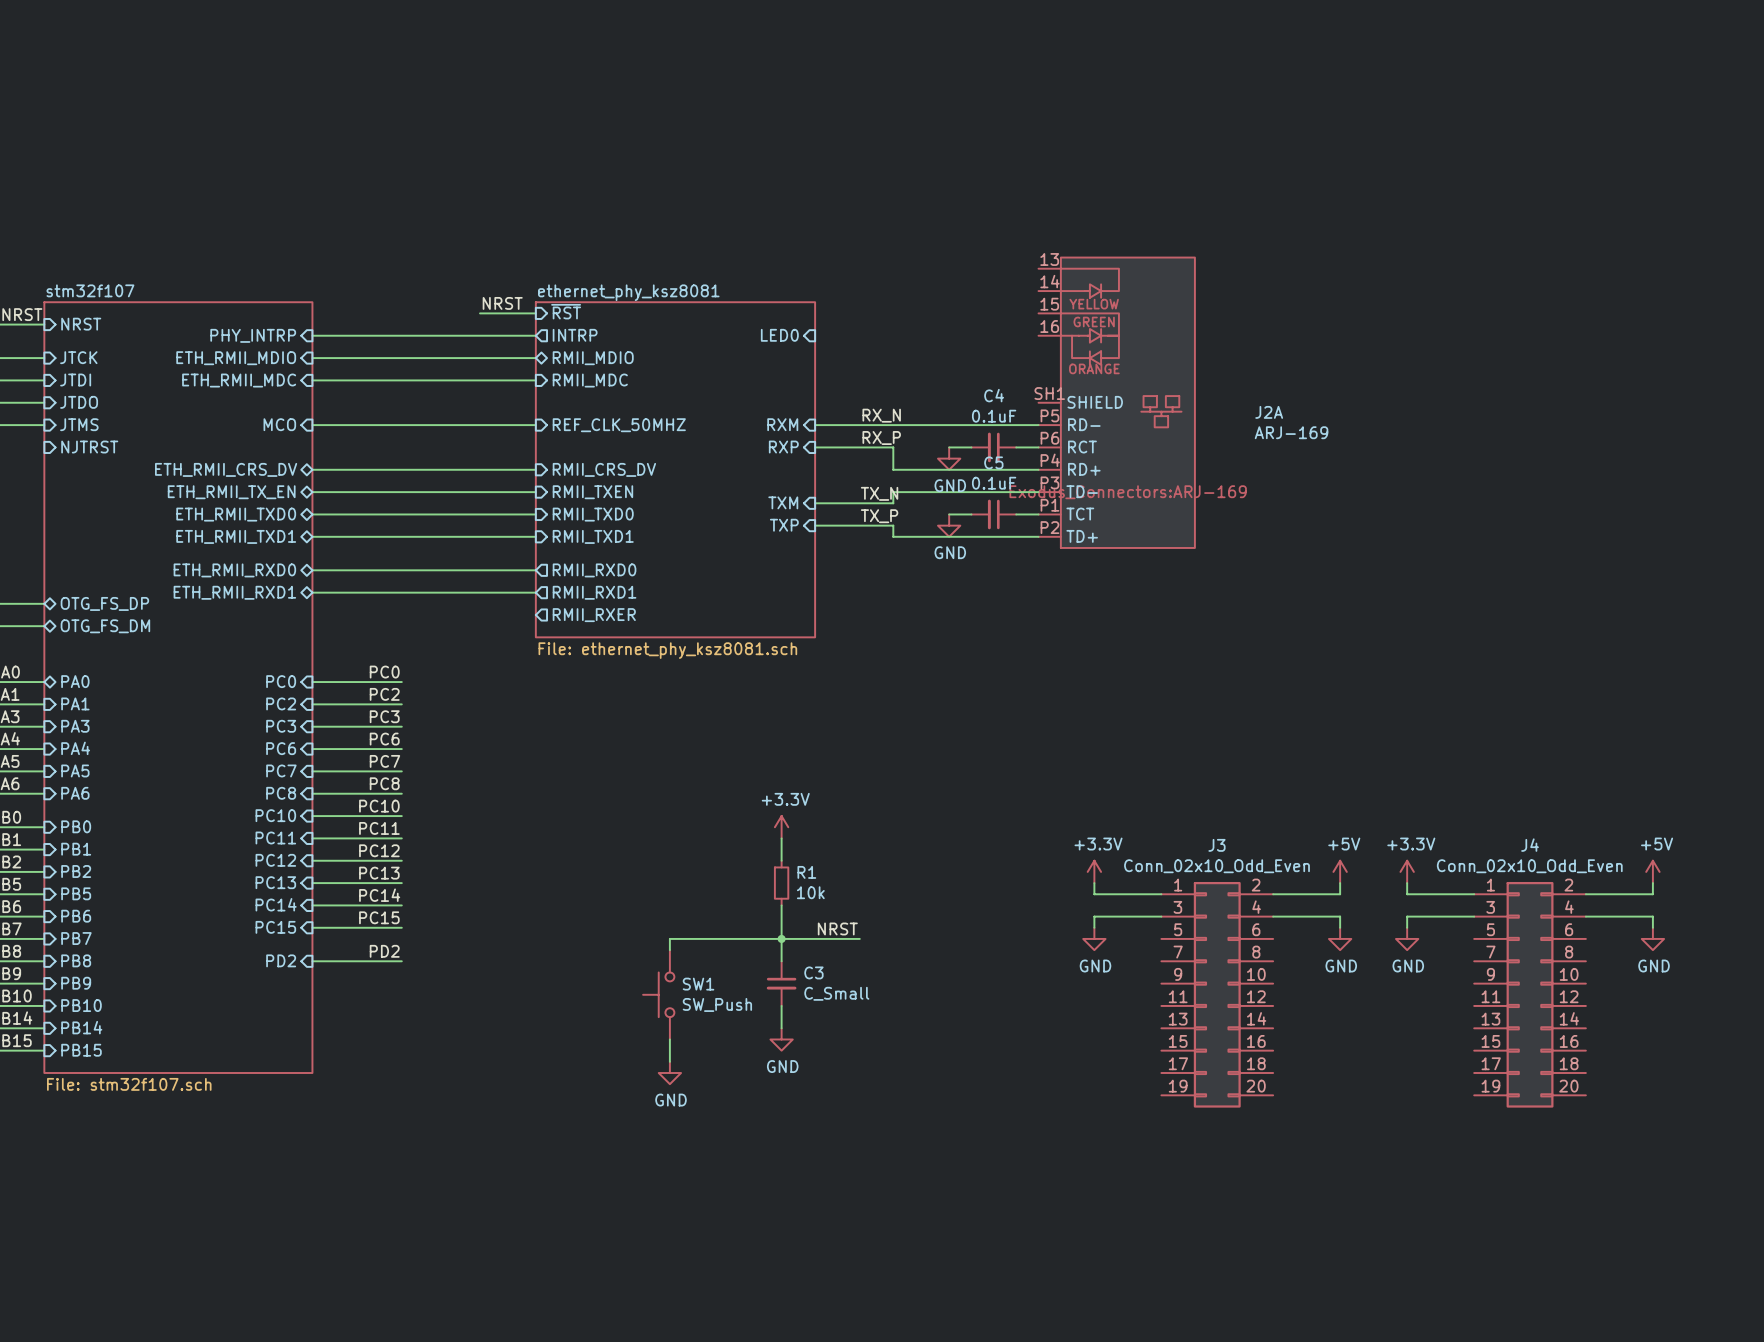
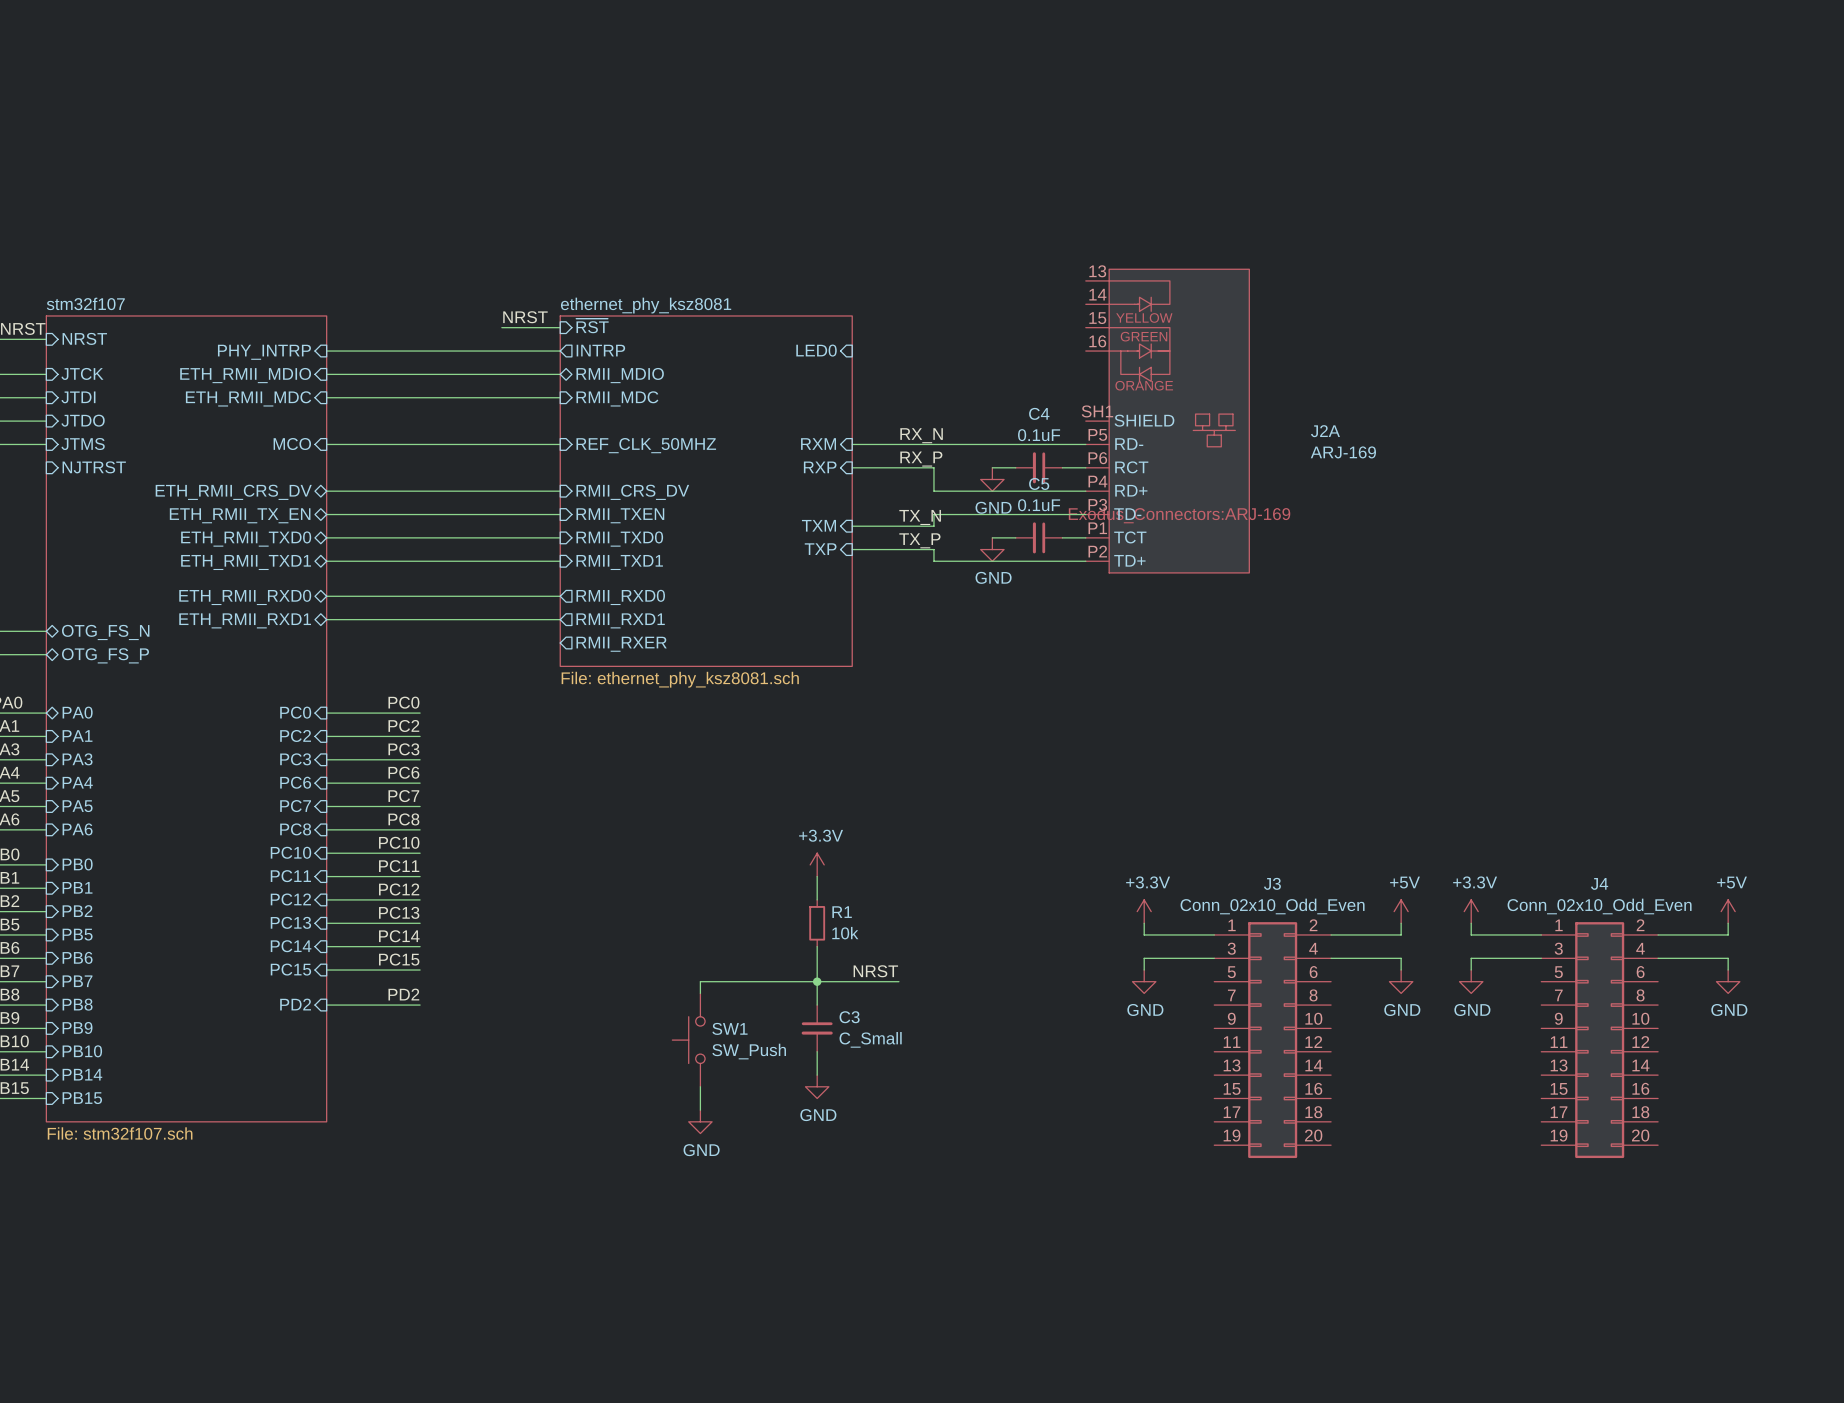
sheet pin: OTG_FS_DP (104, 603) -> OTG_FS_N (105, 632)
sheet pin: OTG_FS_DM (105, 626) -> OTG_FS_P (105, 655)

